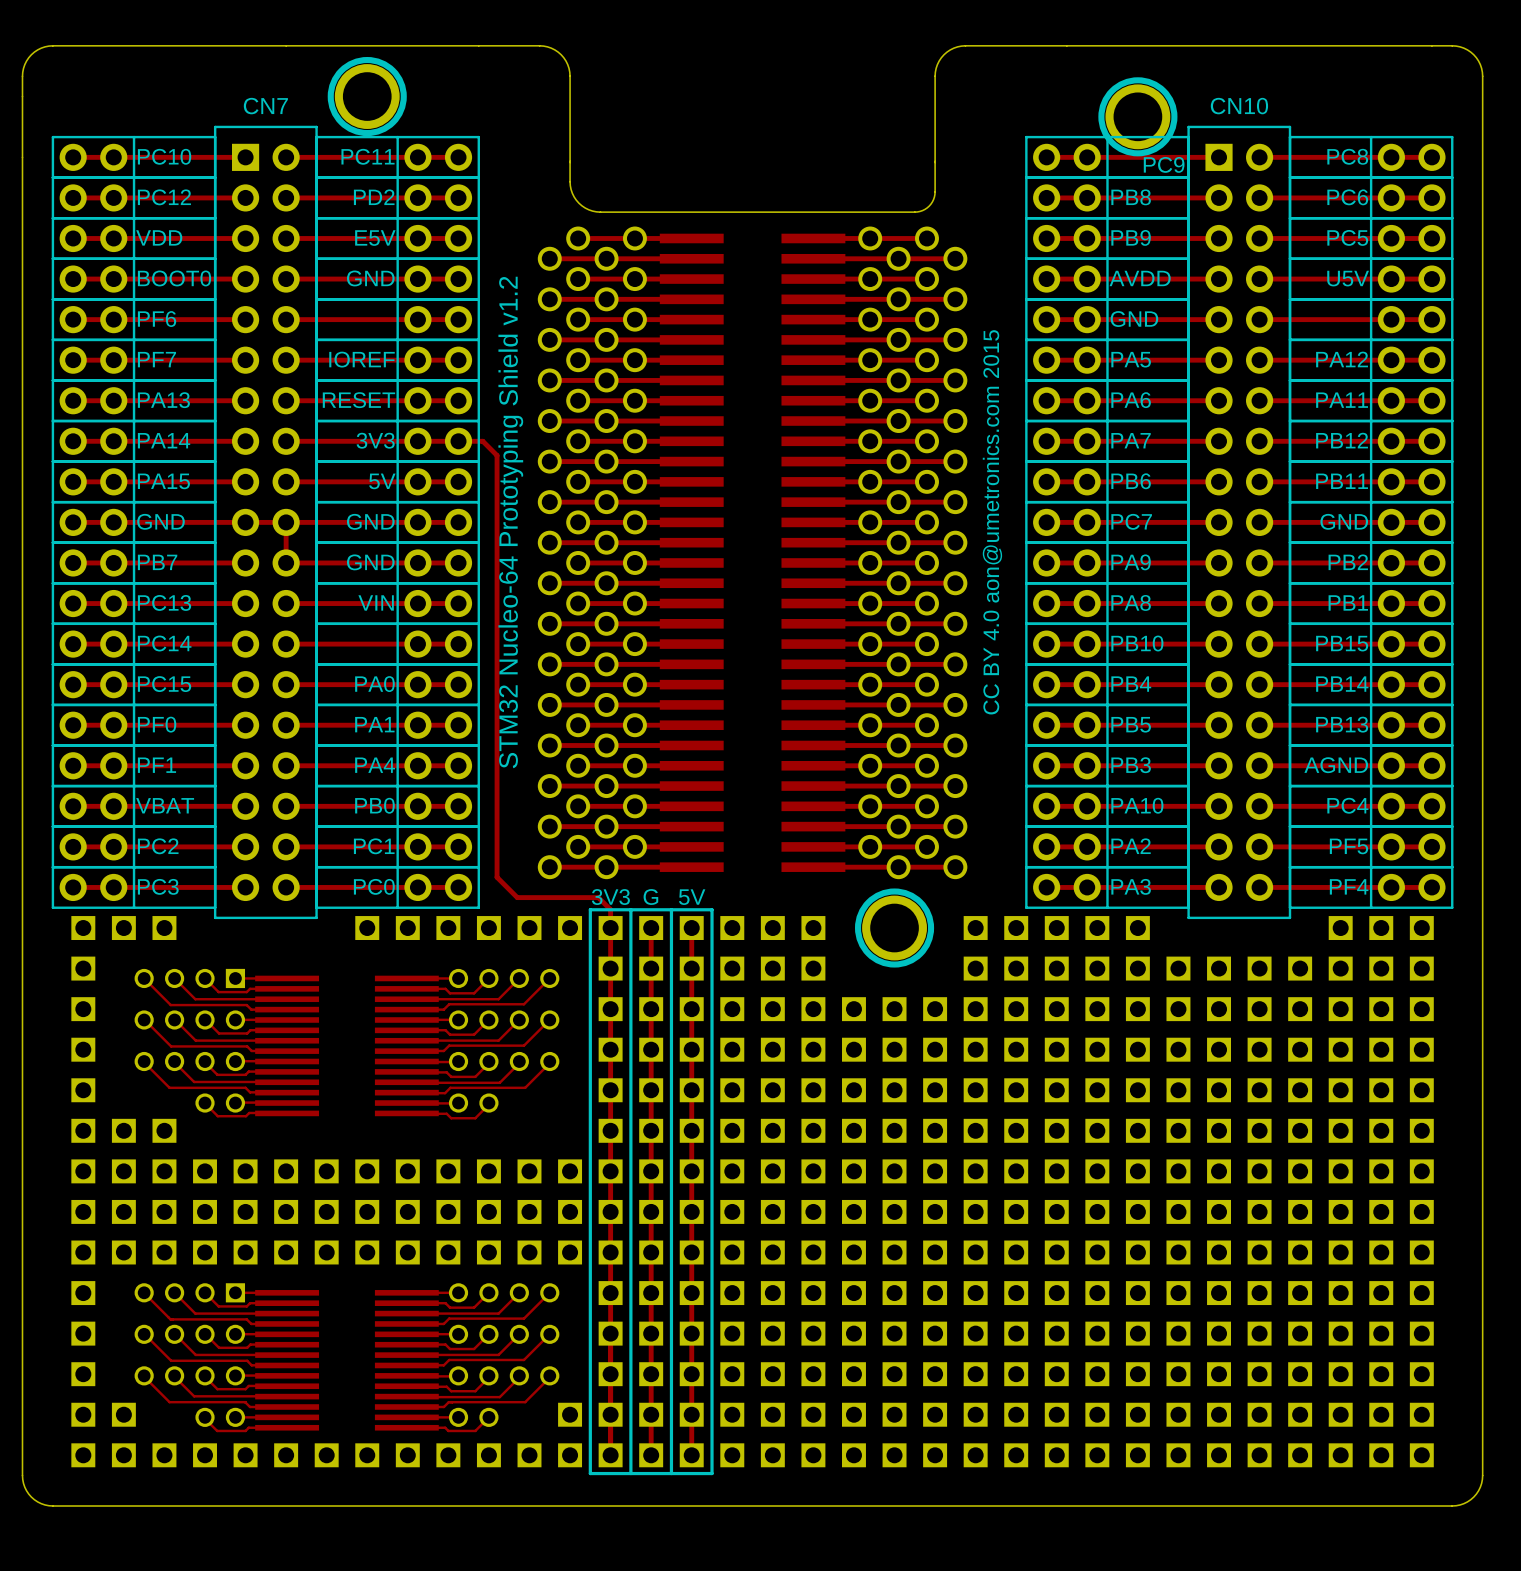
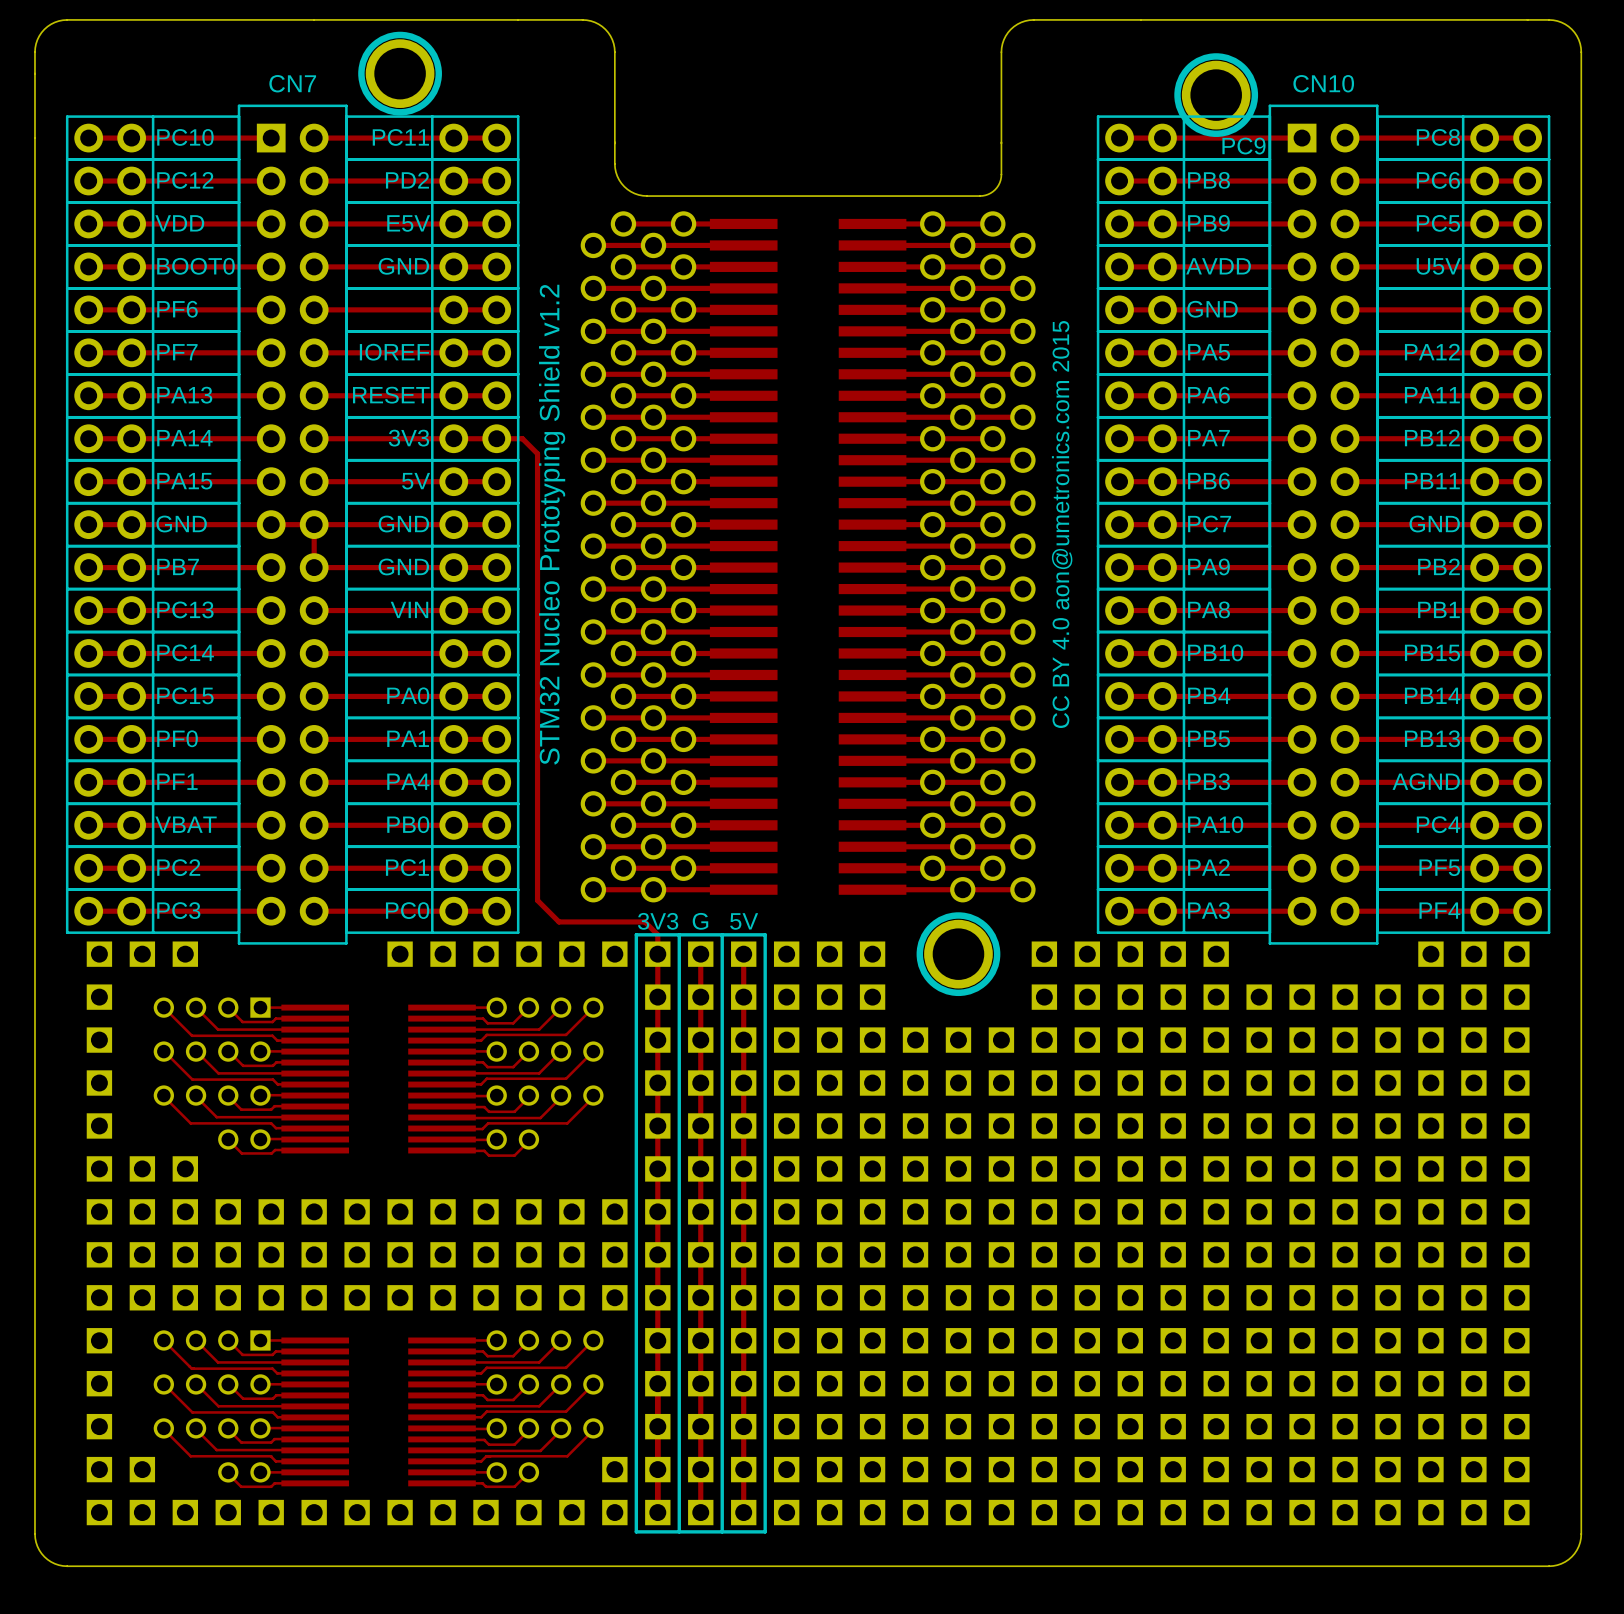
text: STM32 Nucleo-64 Prototyping Shield v1.2 (510, 522) -> STM32 Nucleo Prototyping Shield v1.2 (552, 524)

